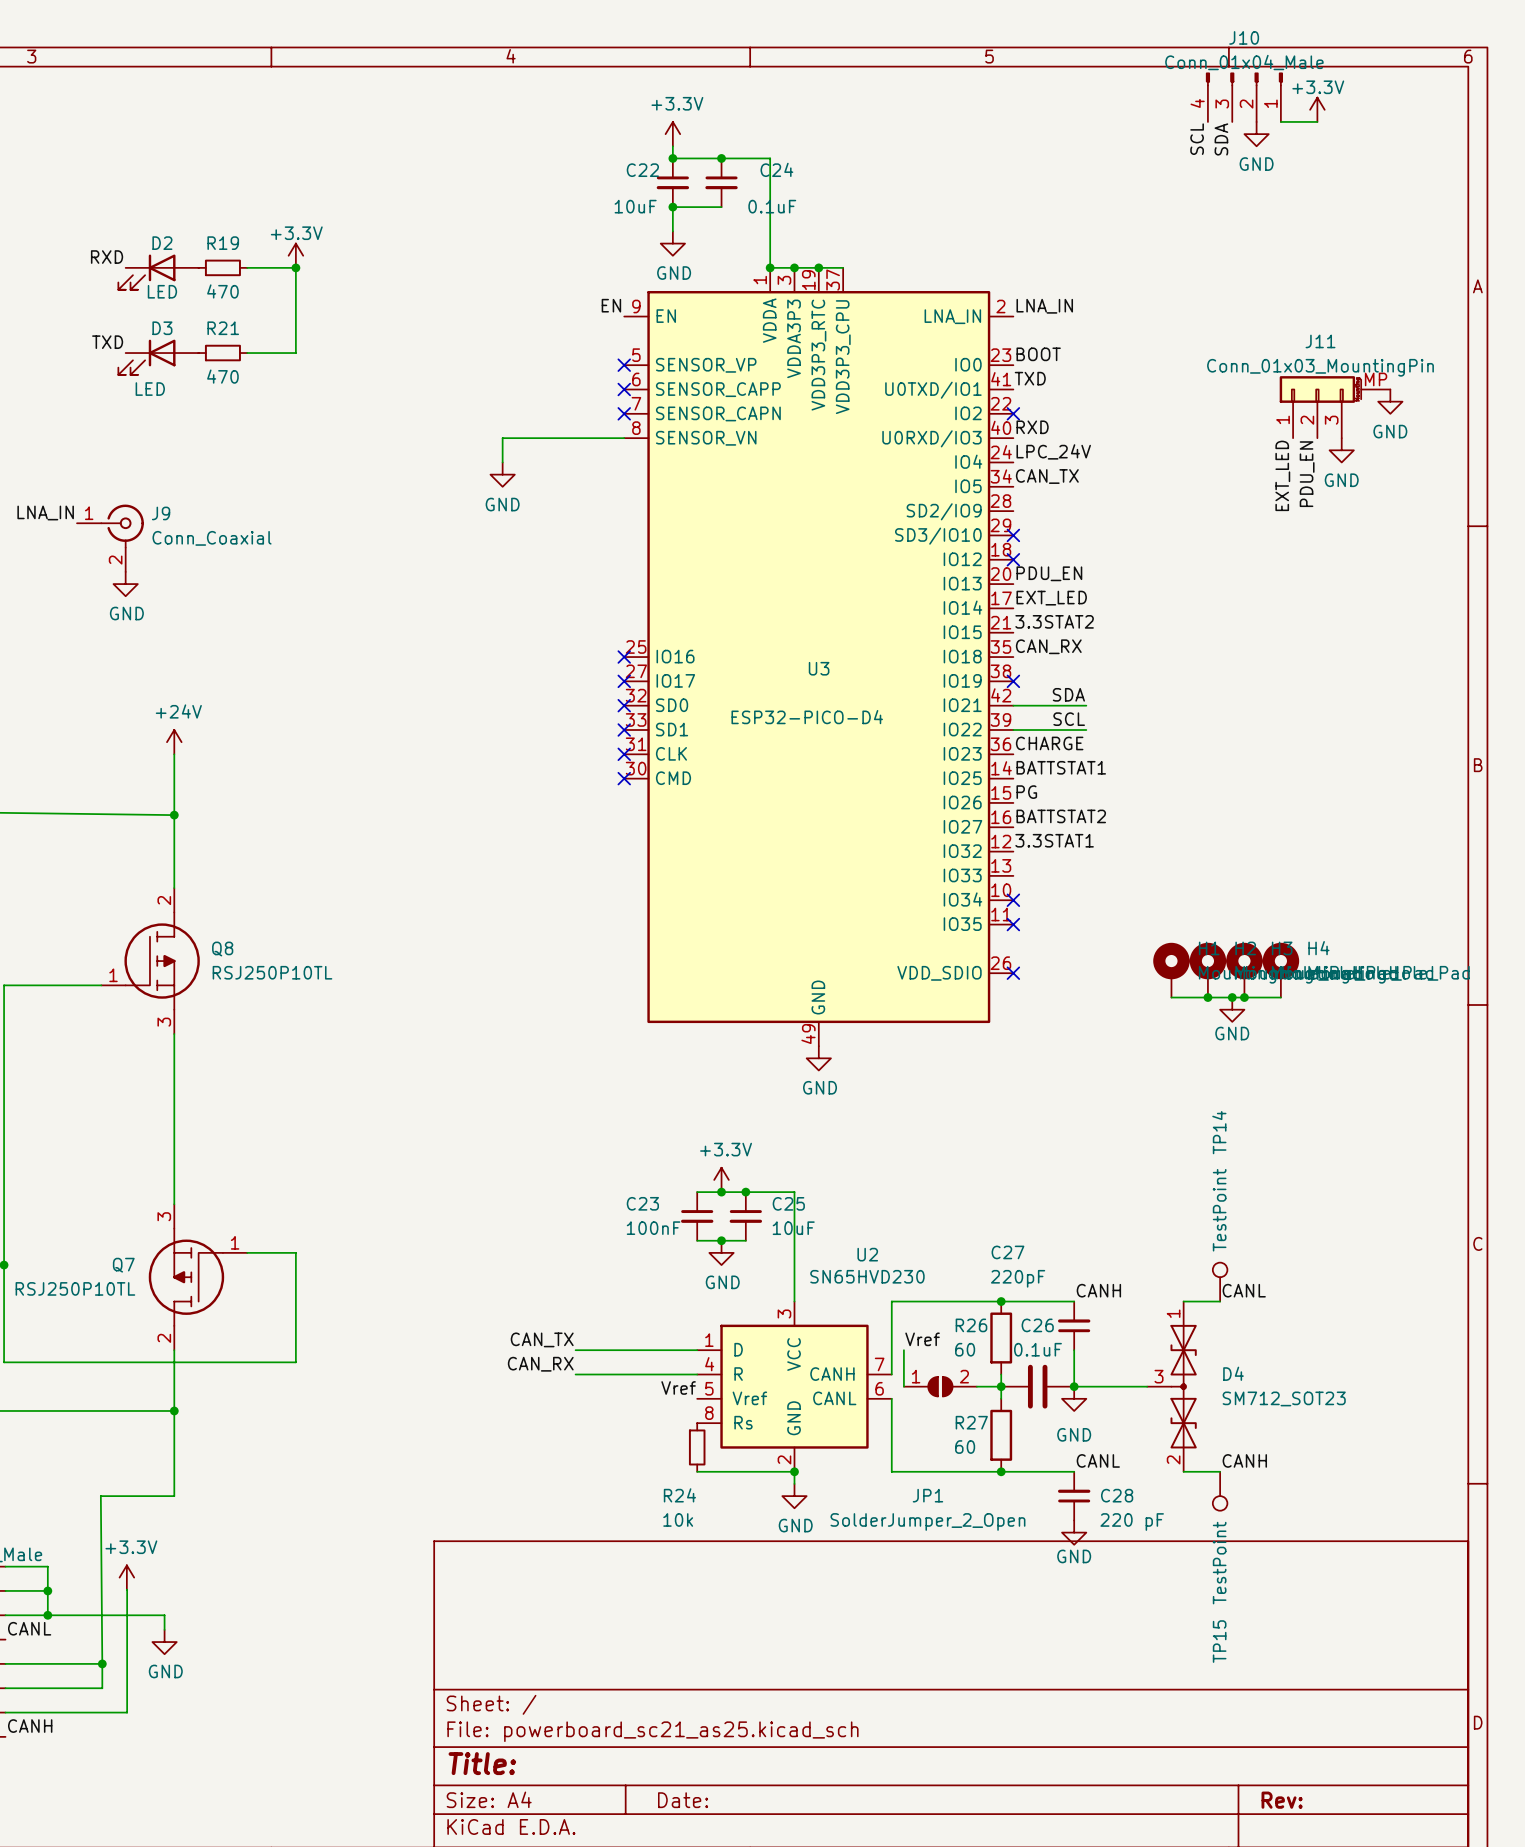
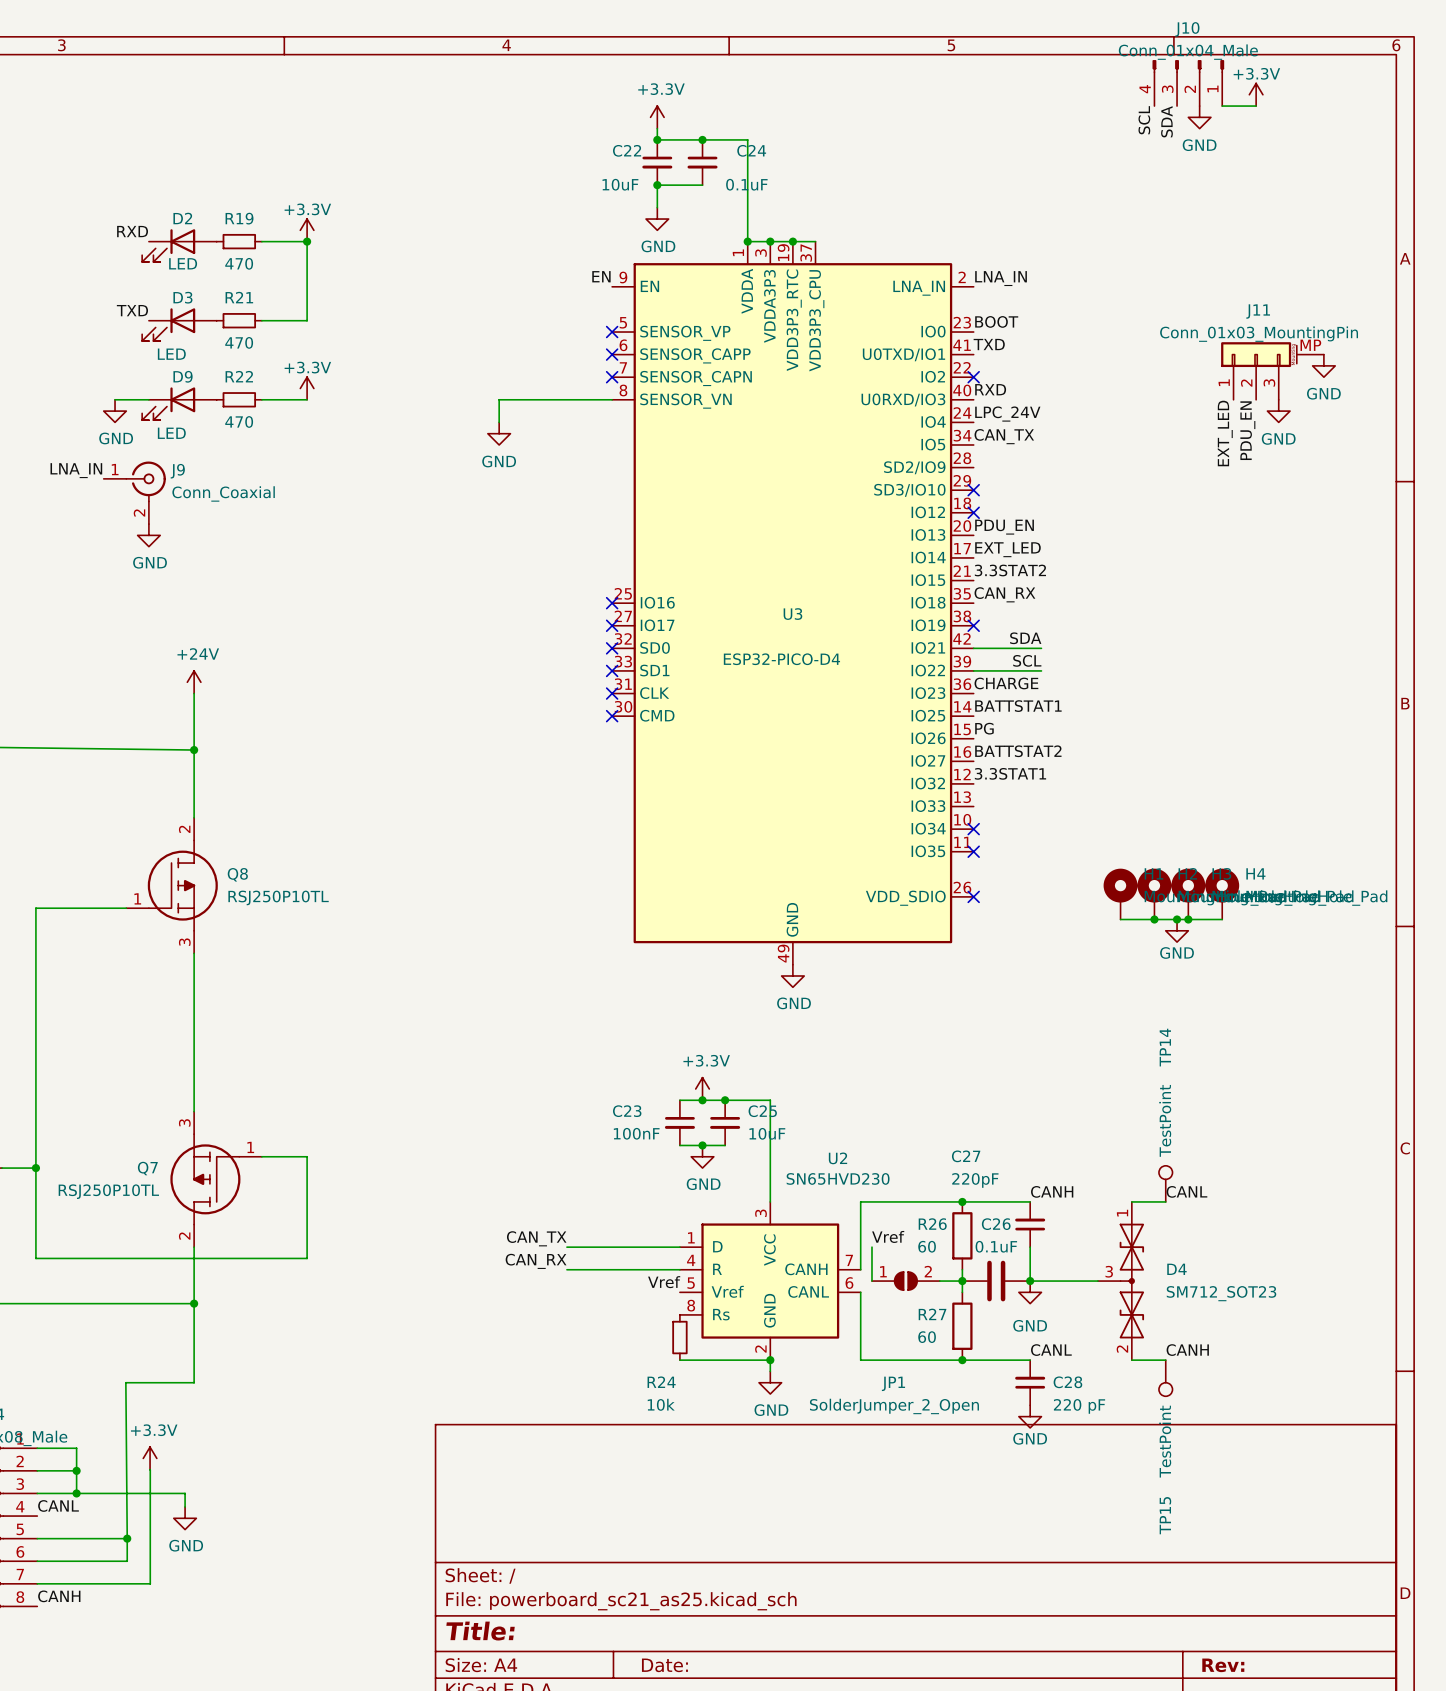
power symbol: none -> +3.3V (307, 388)
wire: none -> (115, 399) (148, 399)
R22: none -> 470 (239, 399)
wire: none -> (261, 399) (307, 399)
D9: none -> LED (179, 403)
power symbol: none -> GND (115, 411)

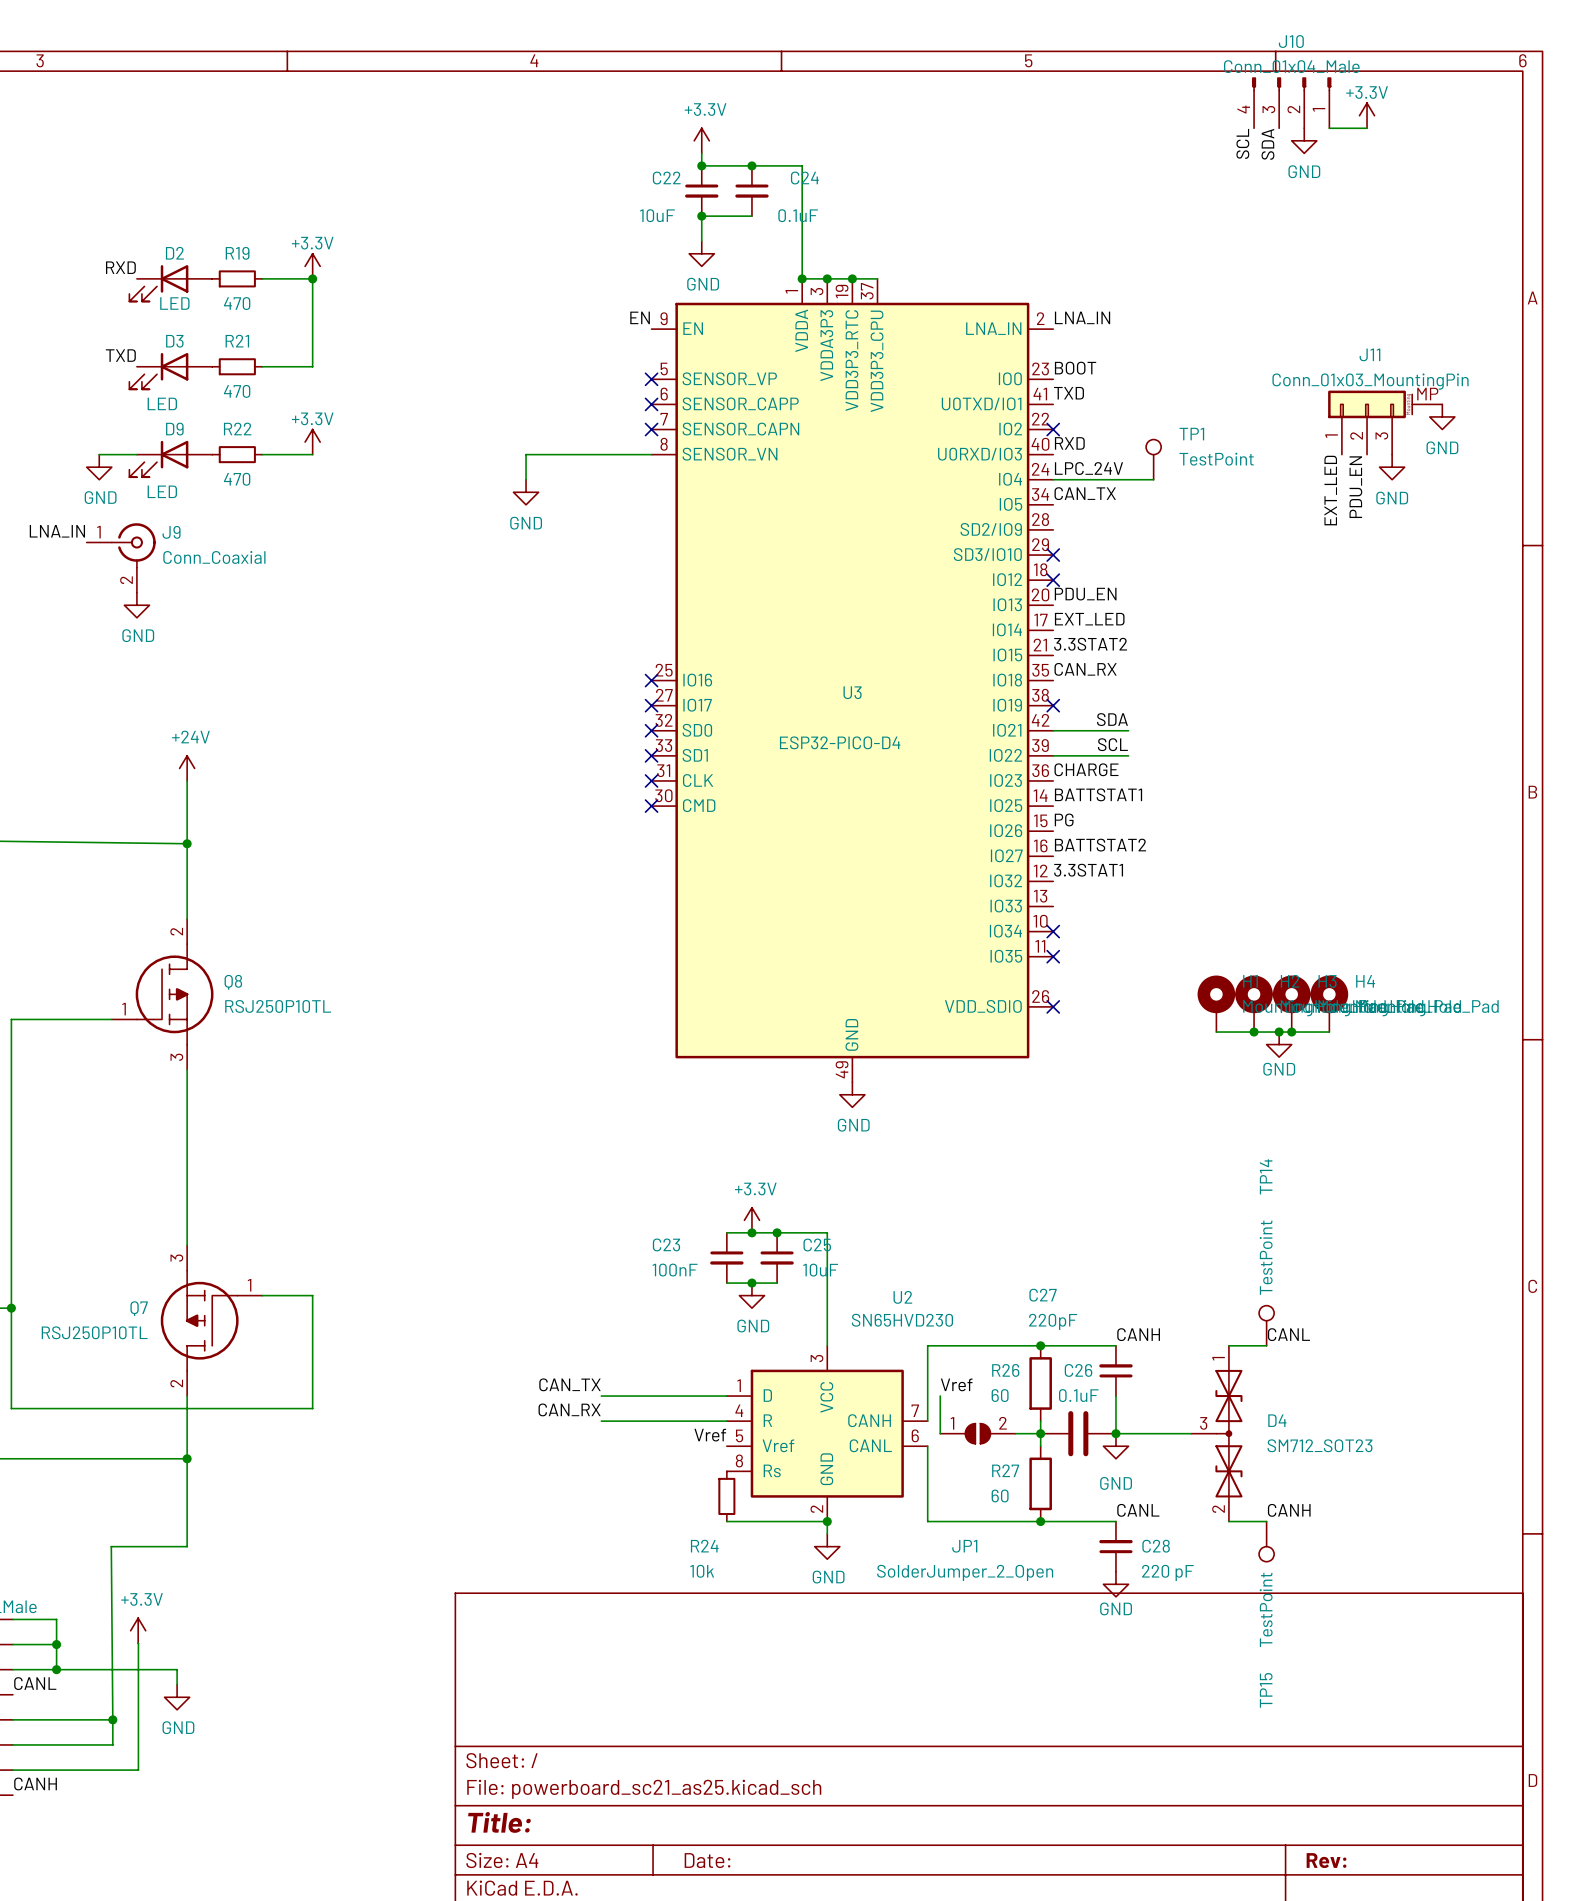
TP1: none -> TestPoint (1153, 459)
wire: none -> (1053, 479) (1153, 479)

